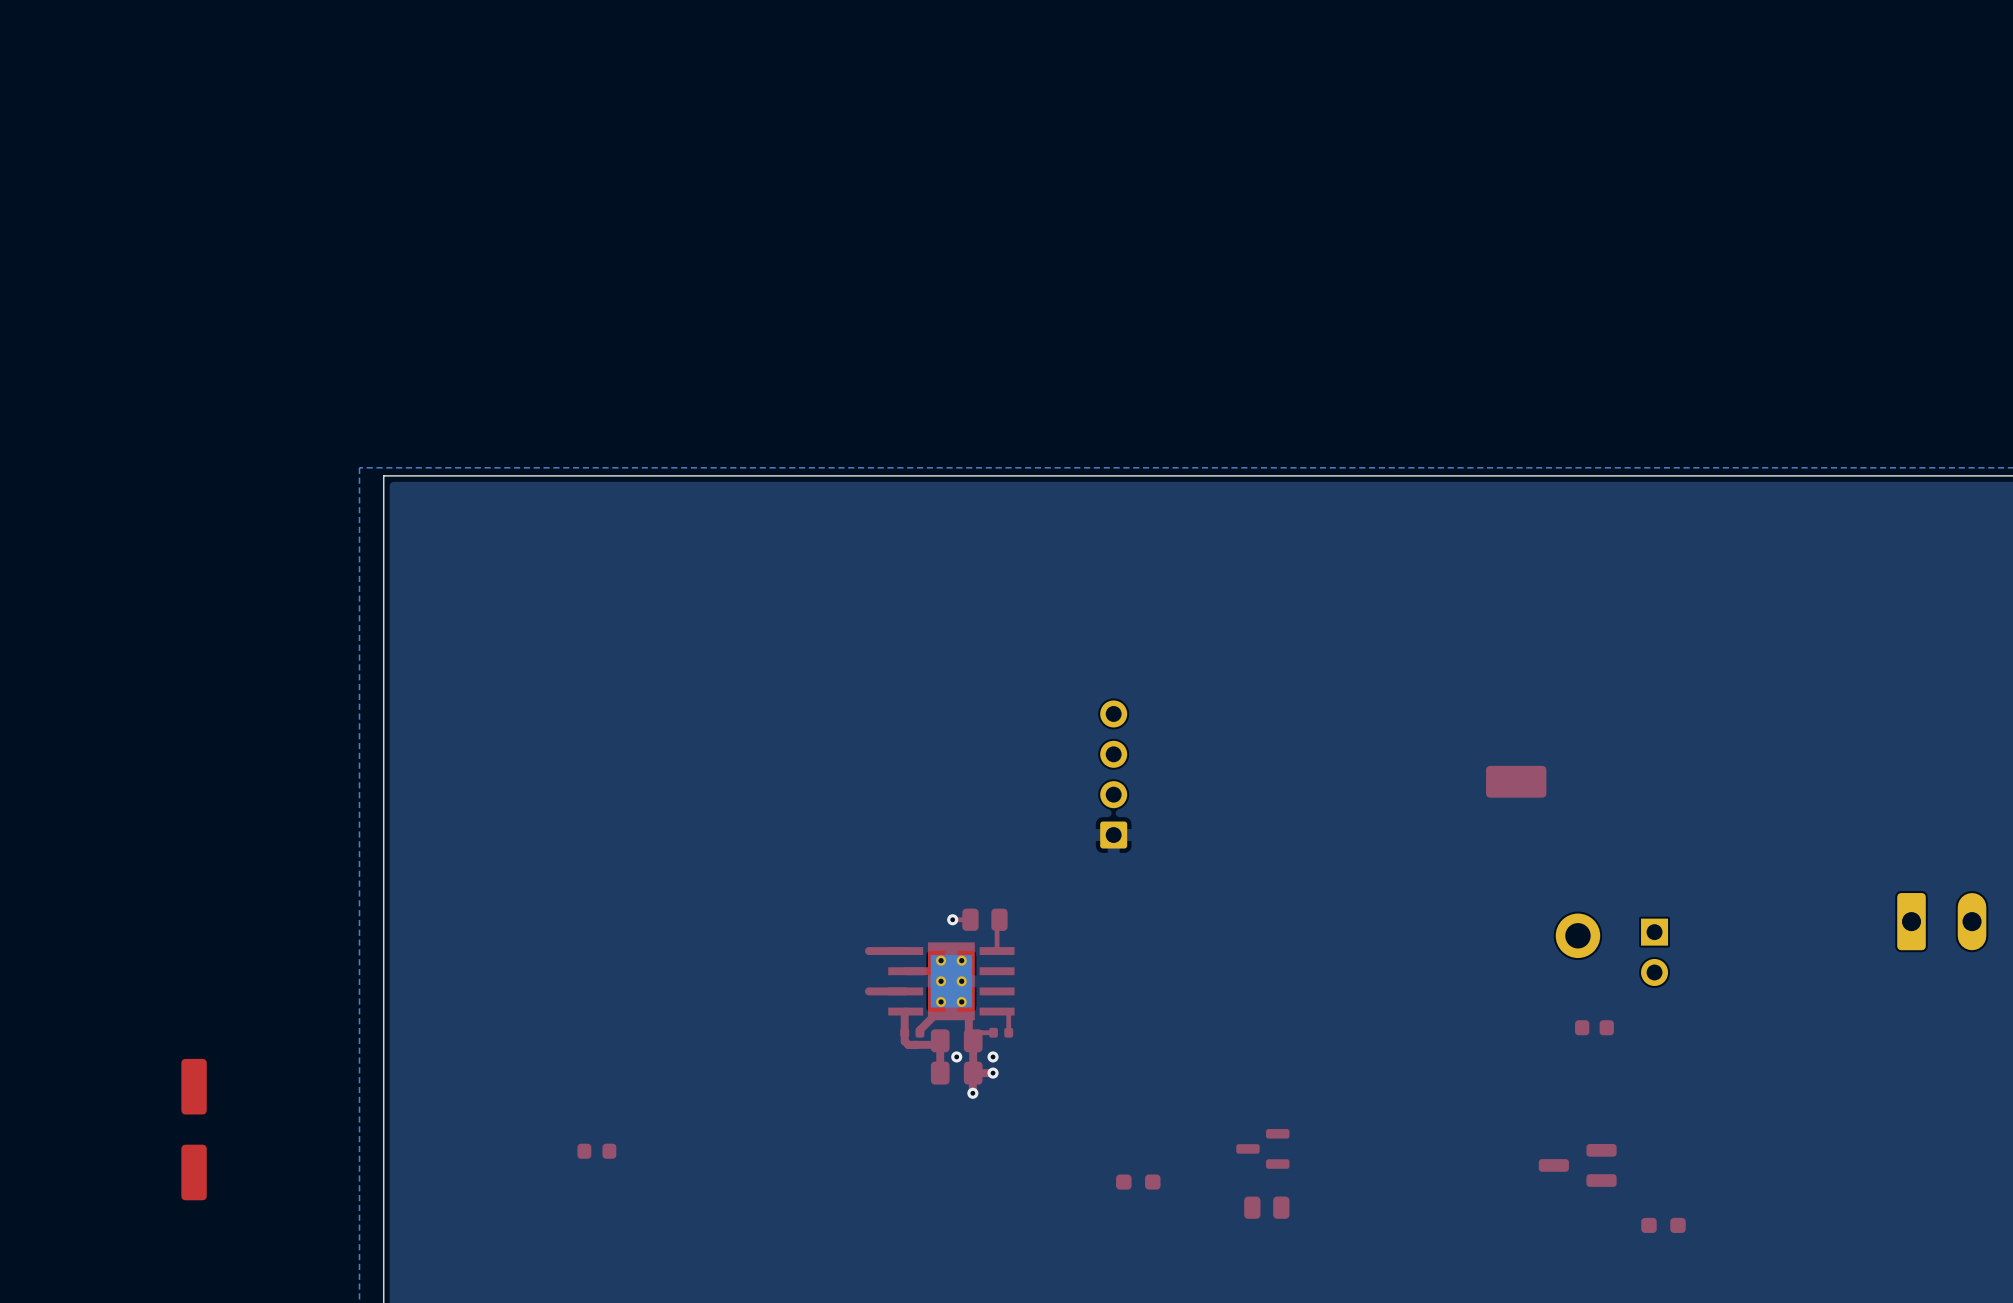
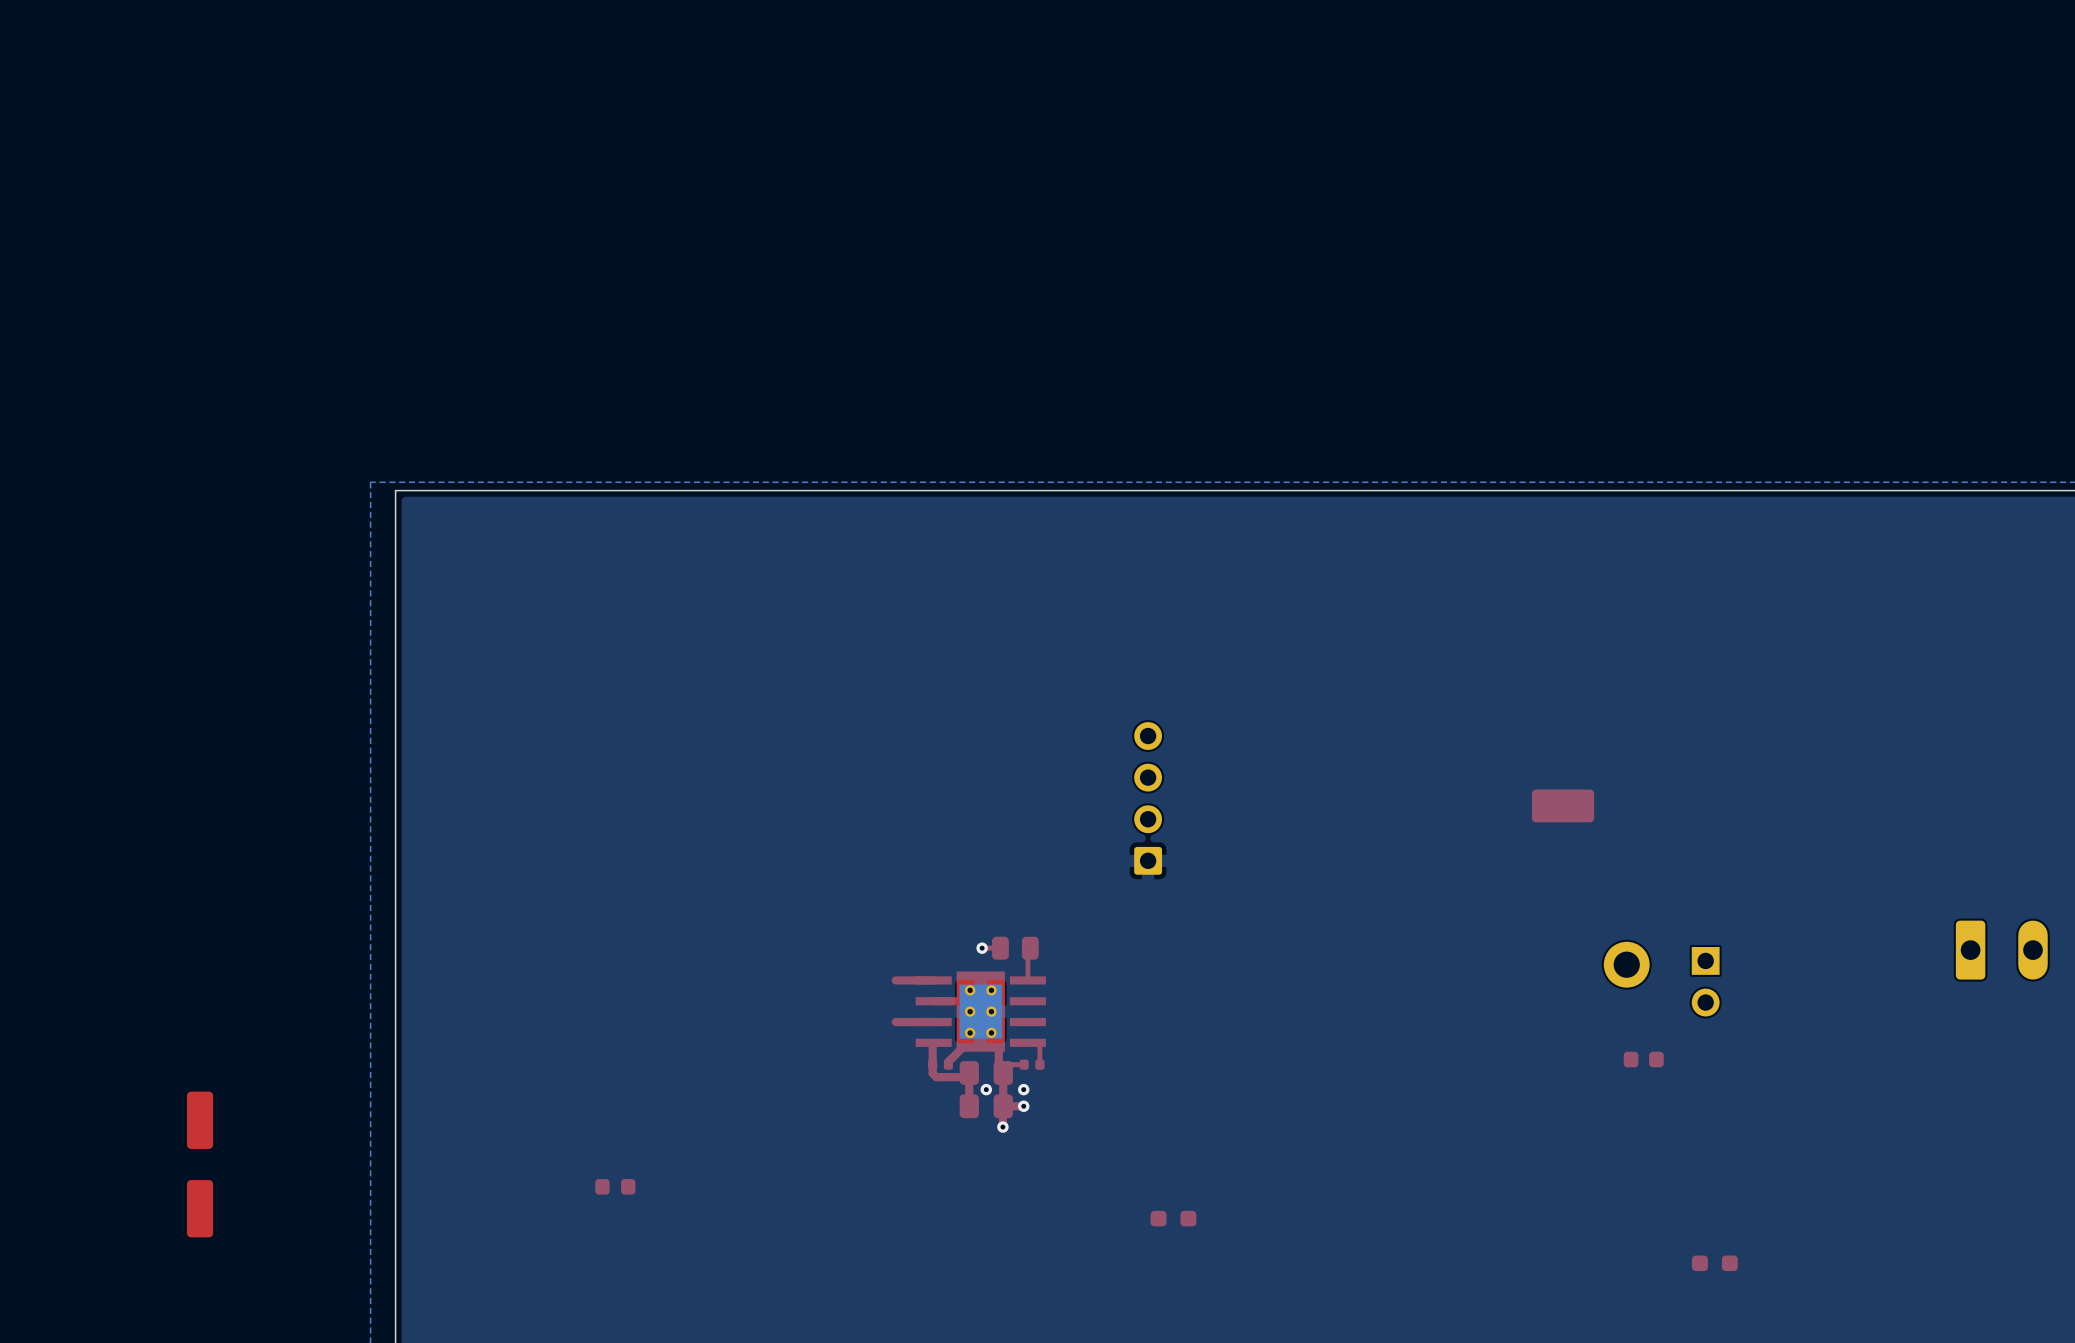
part: (1262, 1148) -> none
part: (1577, 1165) -> none
part: (1266, 1207) -> none

